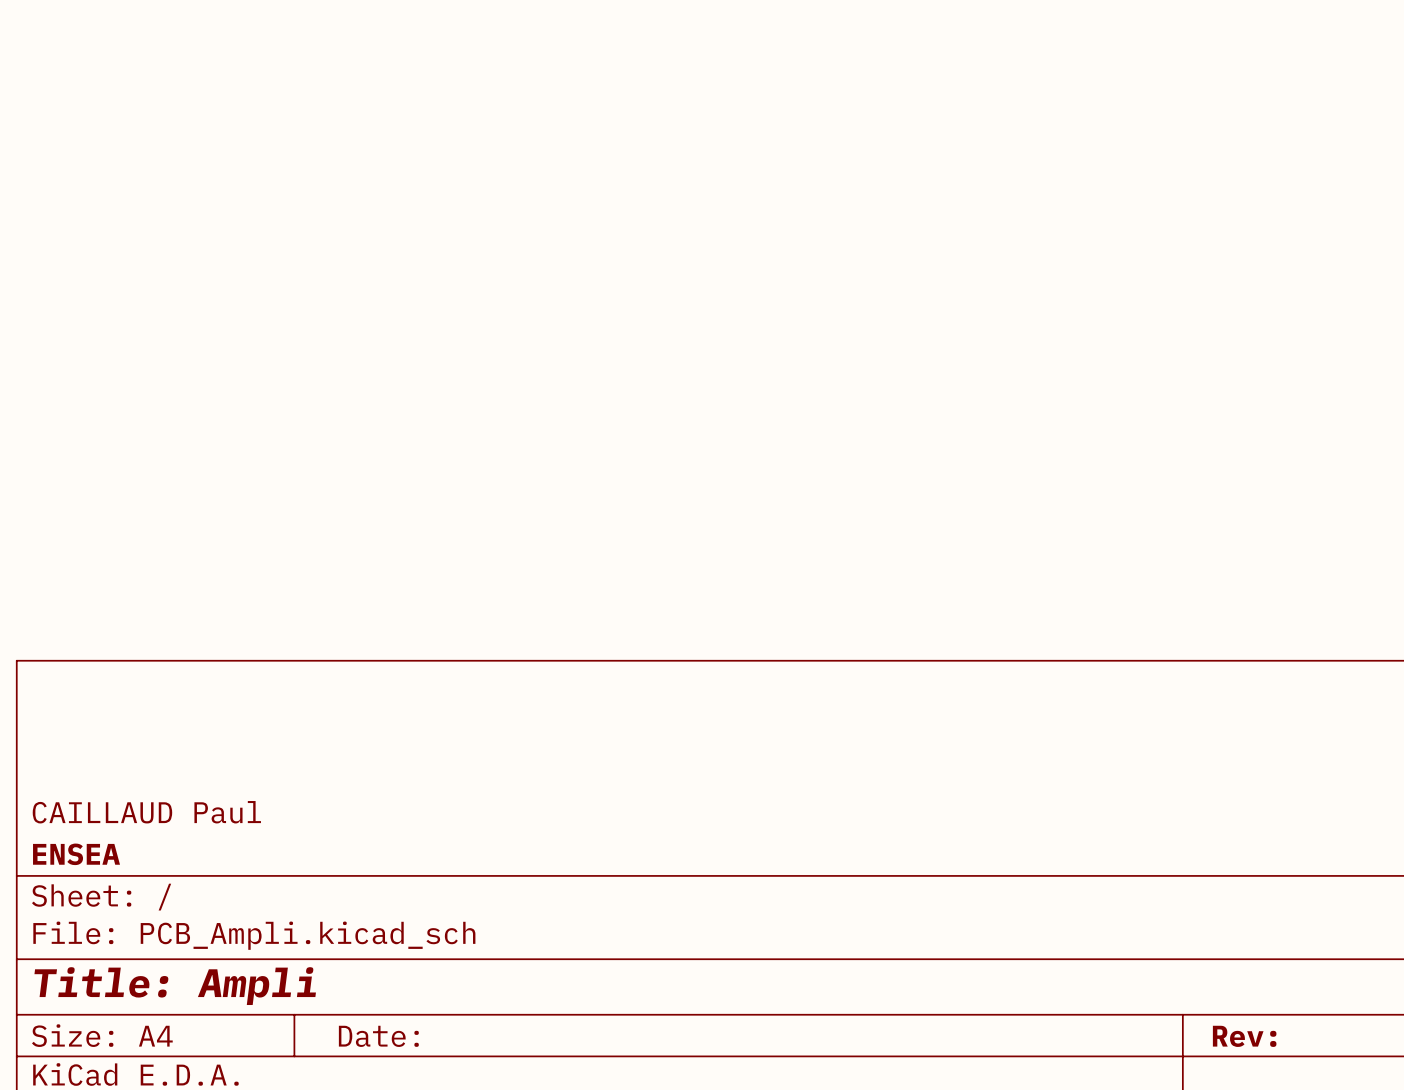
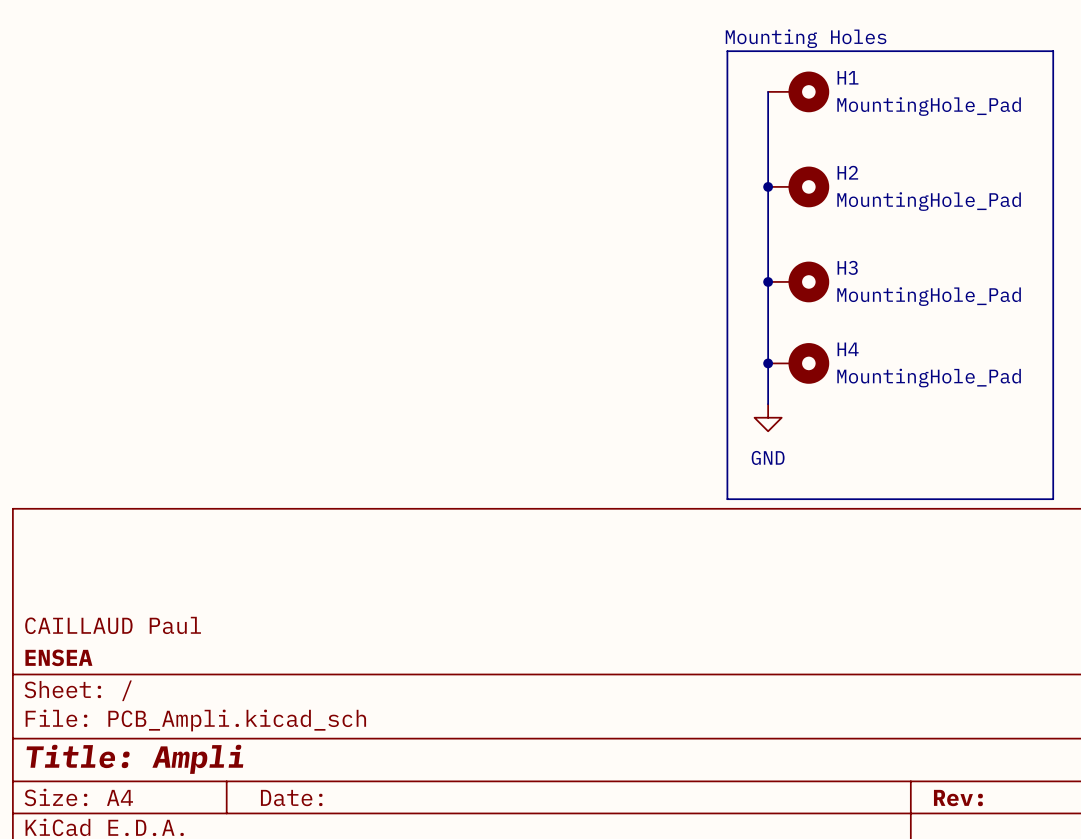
text: none -> Mounting Holes (806, 38)
line: none -> (727, 51) (1053, 51) (1053, 499) (727, 499) (727, 51)
wire: none -> (768, 91) (768, 404)
H1: none -> MountingHole_Pad (798, 91)
junction: none -> (768, 186)
H2: none -> MountingHole_Pad (798, 186)
junction: none -> (768, 281)
H3: none -> MountingHole_Pad (798, 281)
junction: none -> (768, 363)
H4: none -> MountingHole_Pad (798, 363)
power symbol: none -> GND (768, 417)

